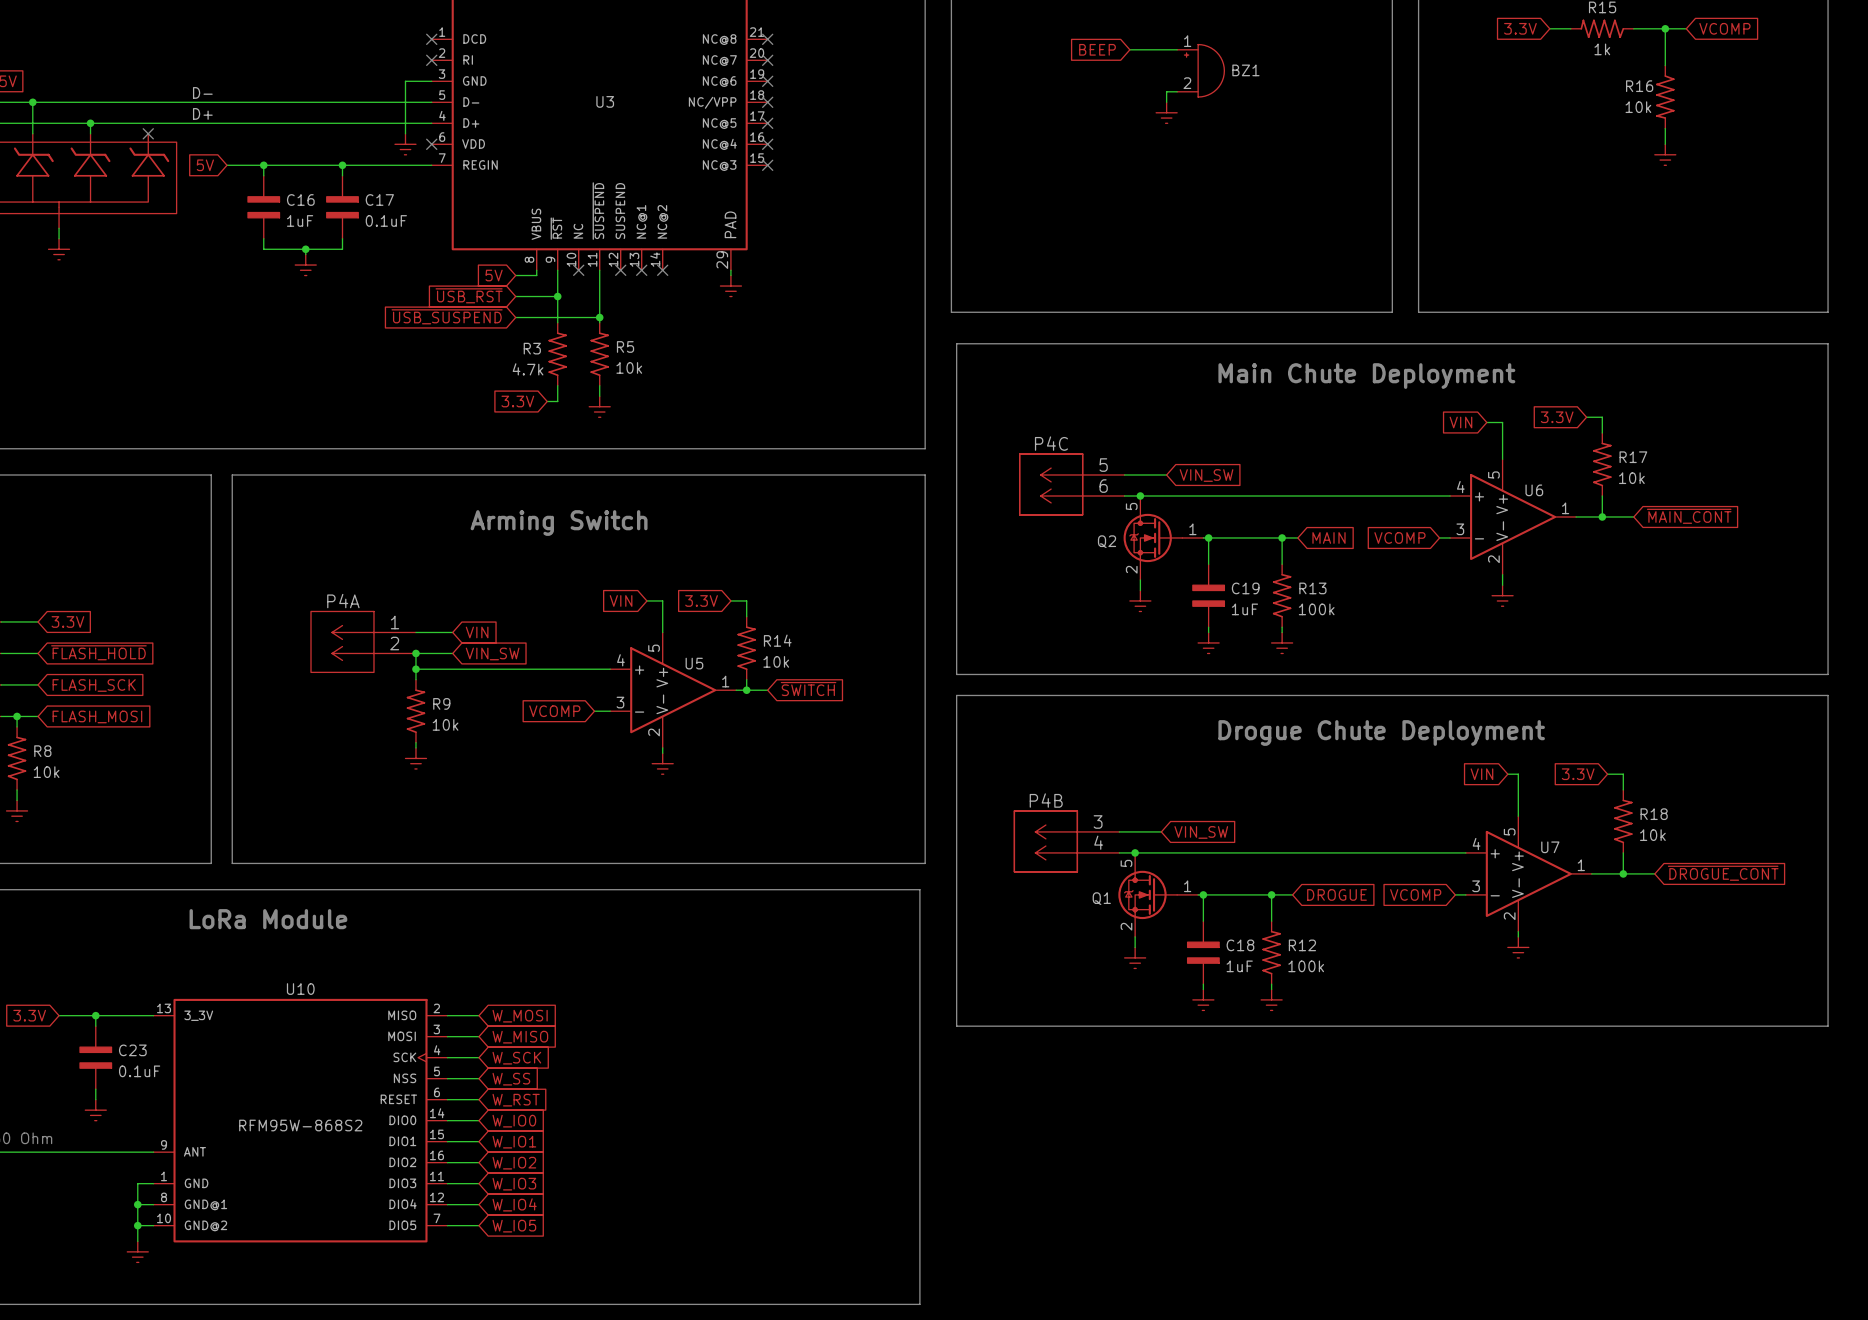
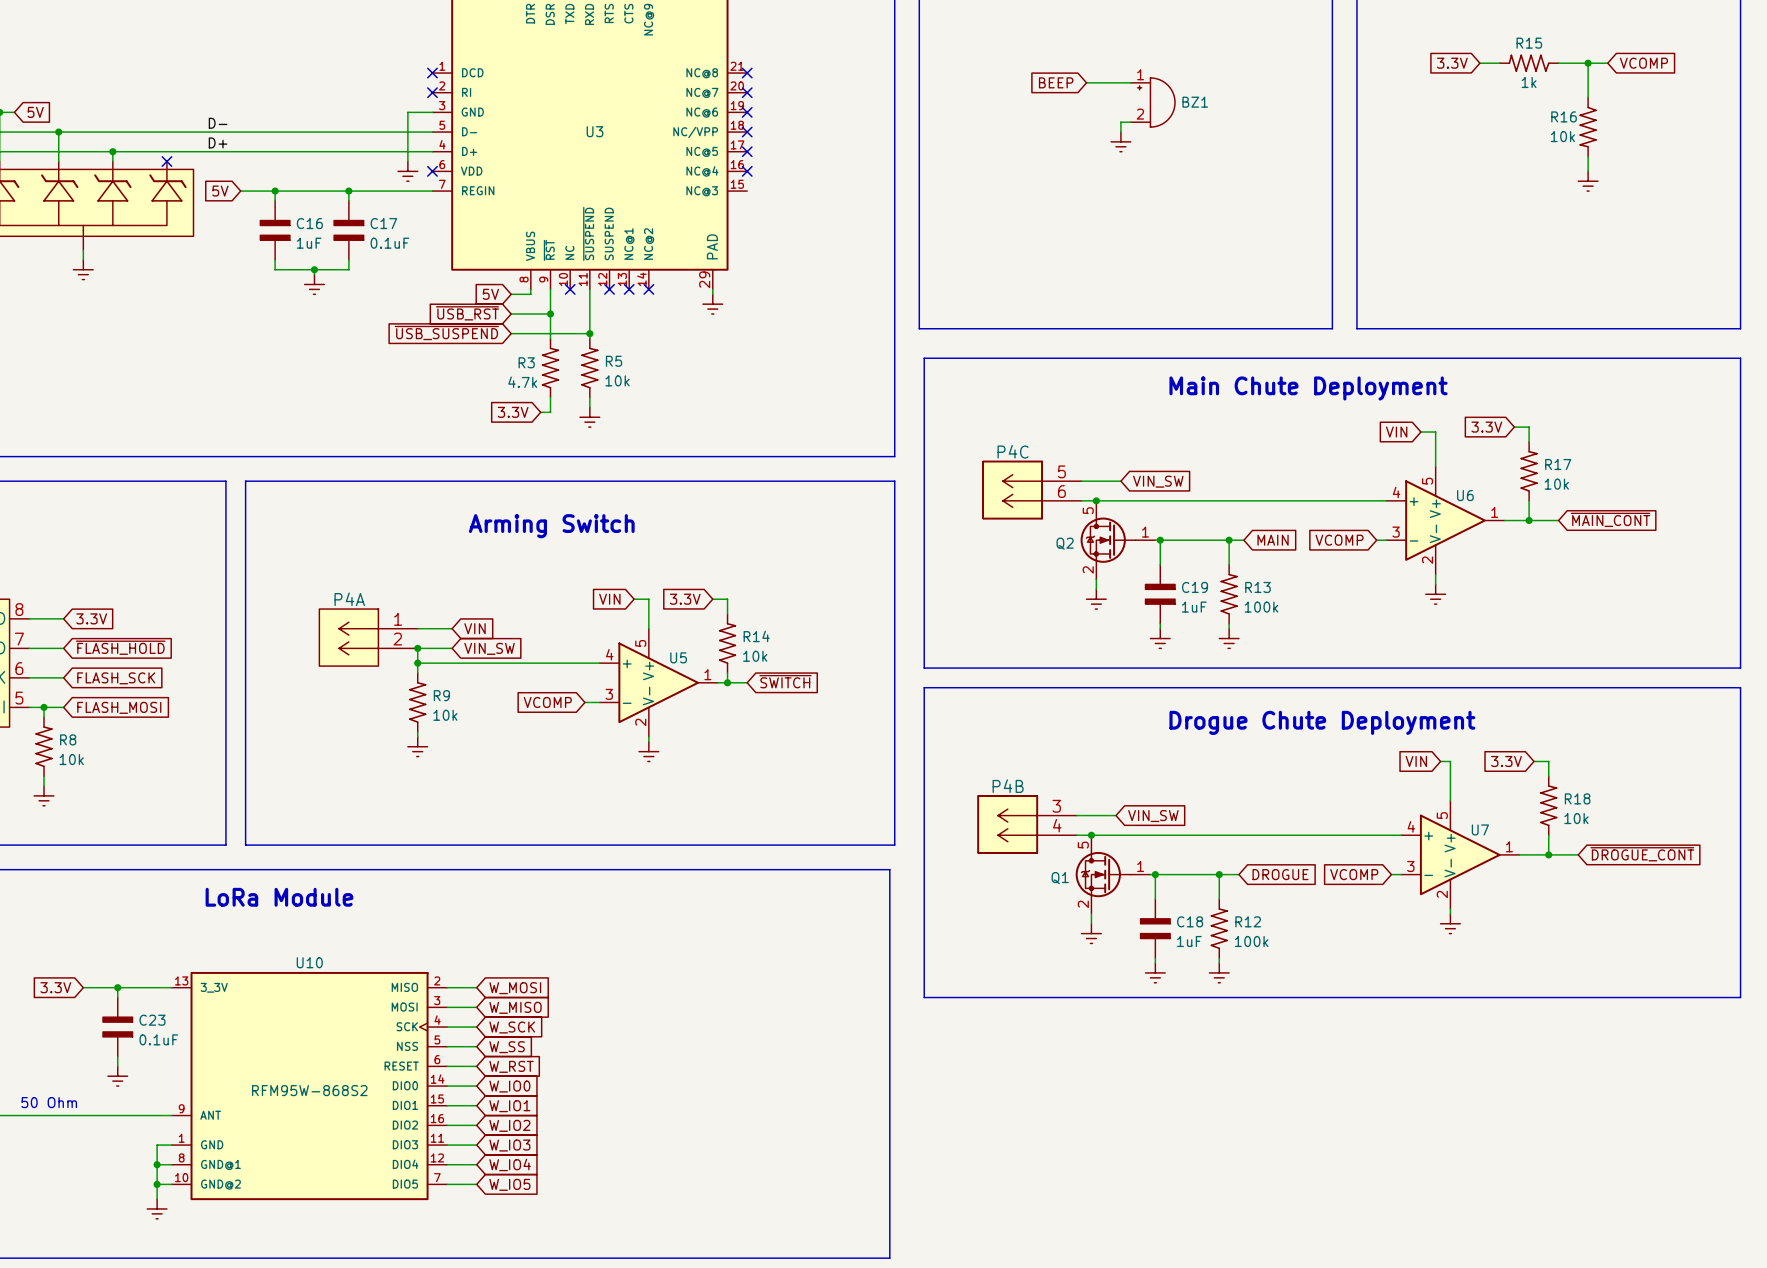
no-connect mark: (767, 165) -> none

